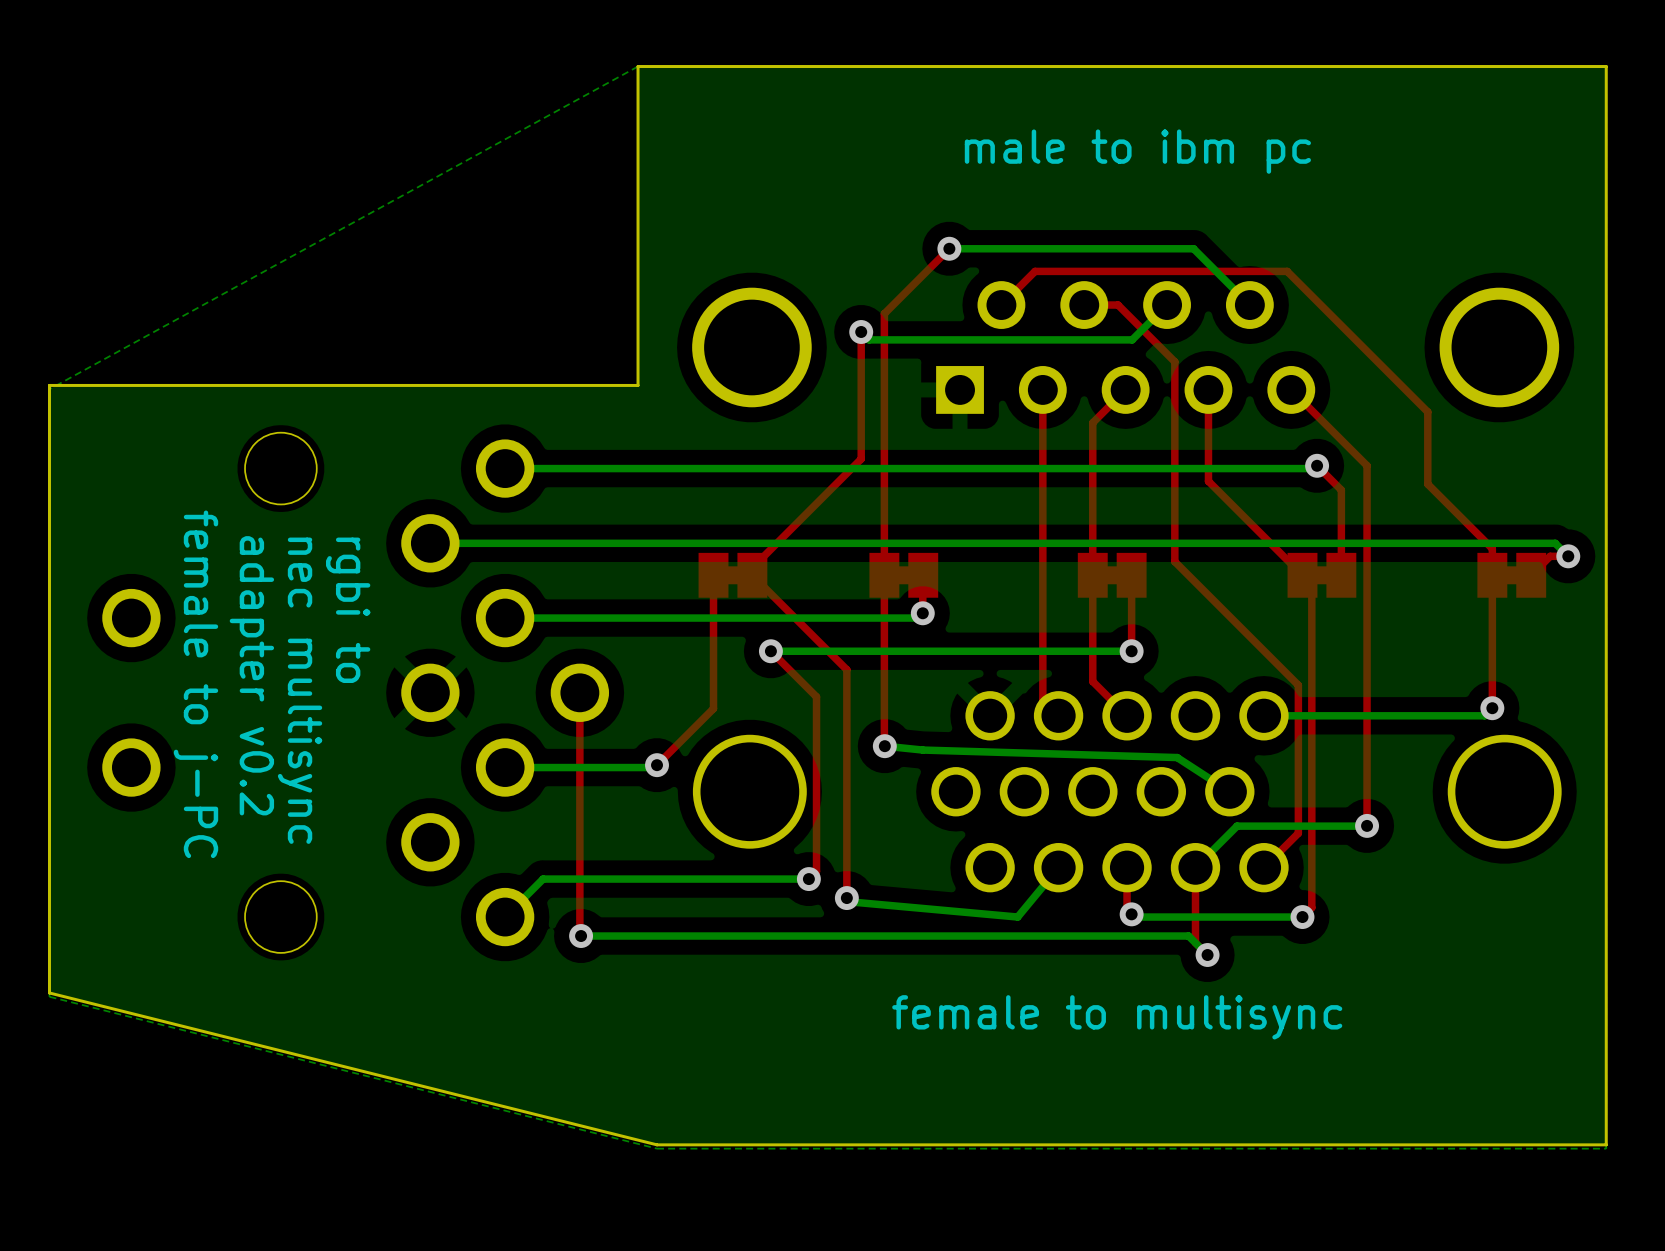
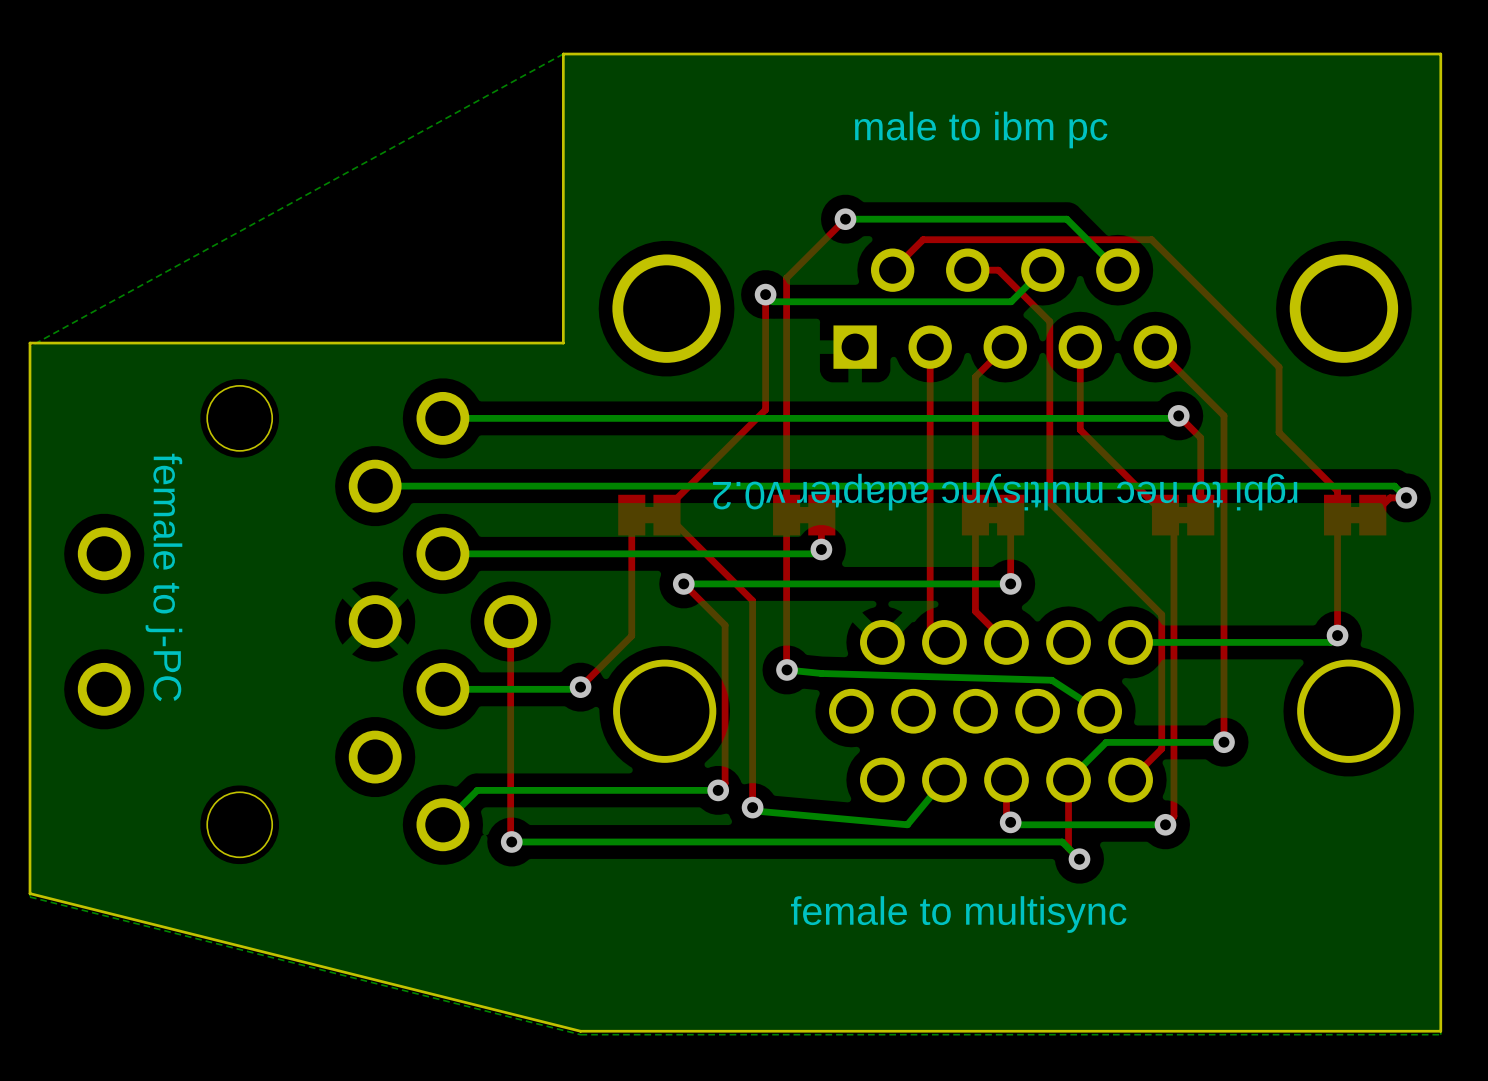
text: none -> rgbi to nec multisync adapter v0.2 (1005, 492)
text: rgbi to (348, 610) -> none
text: adapter v0.2 (251, 675) -> none
text: nec multisync (300, 690) -> none

